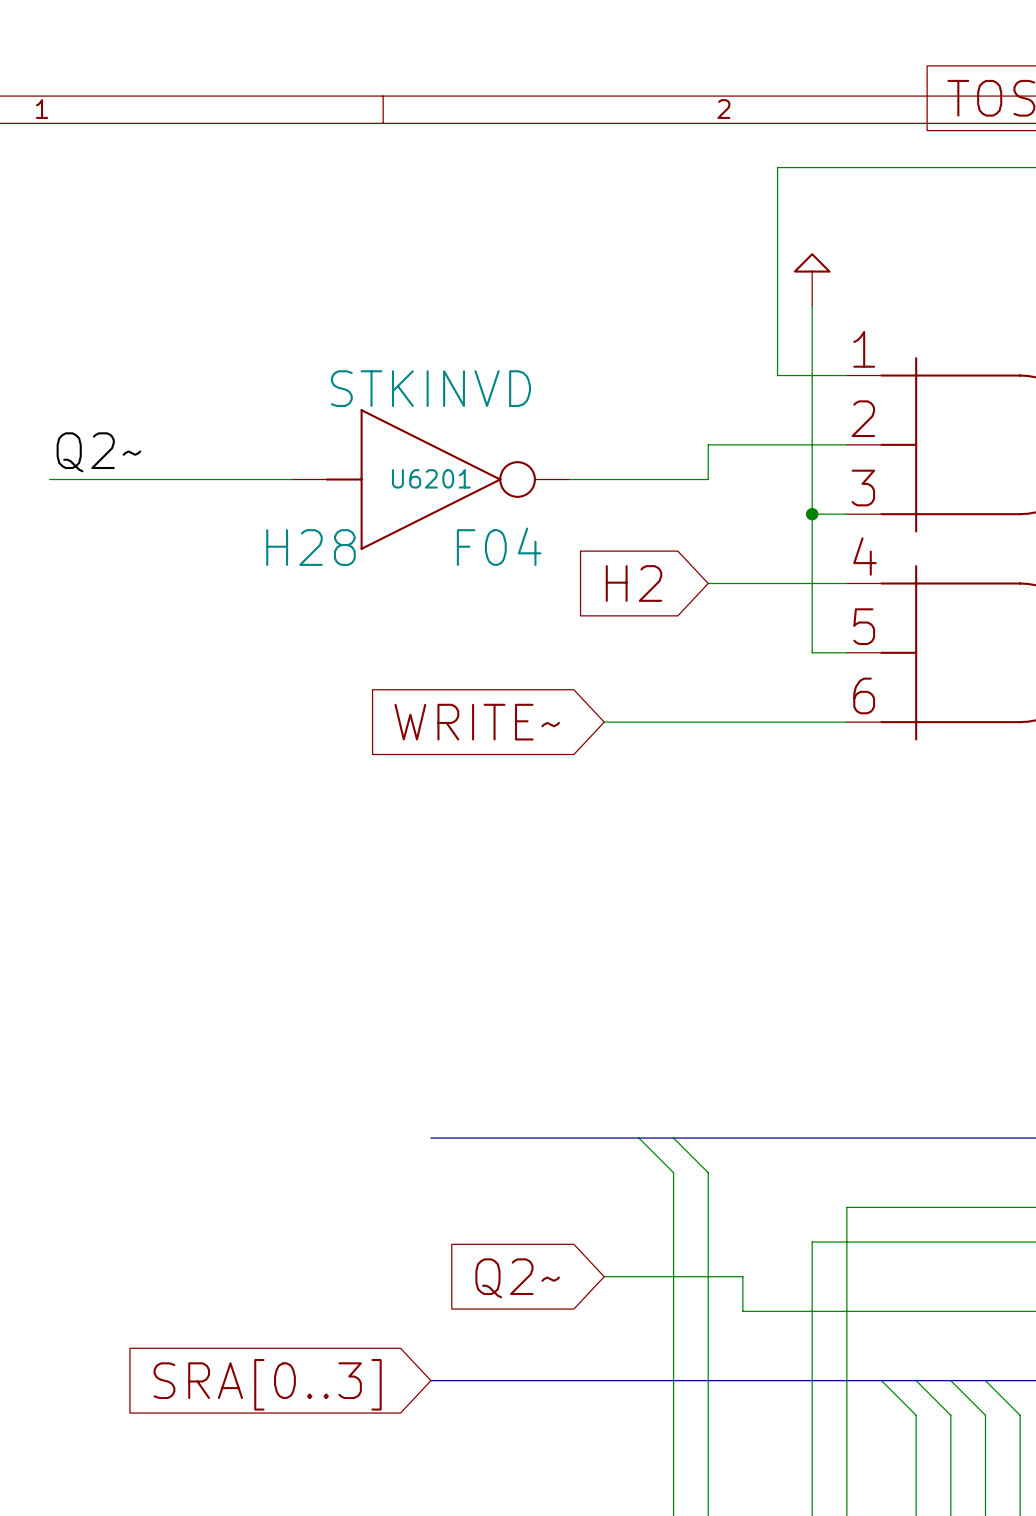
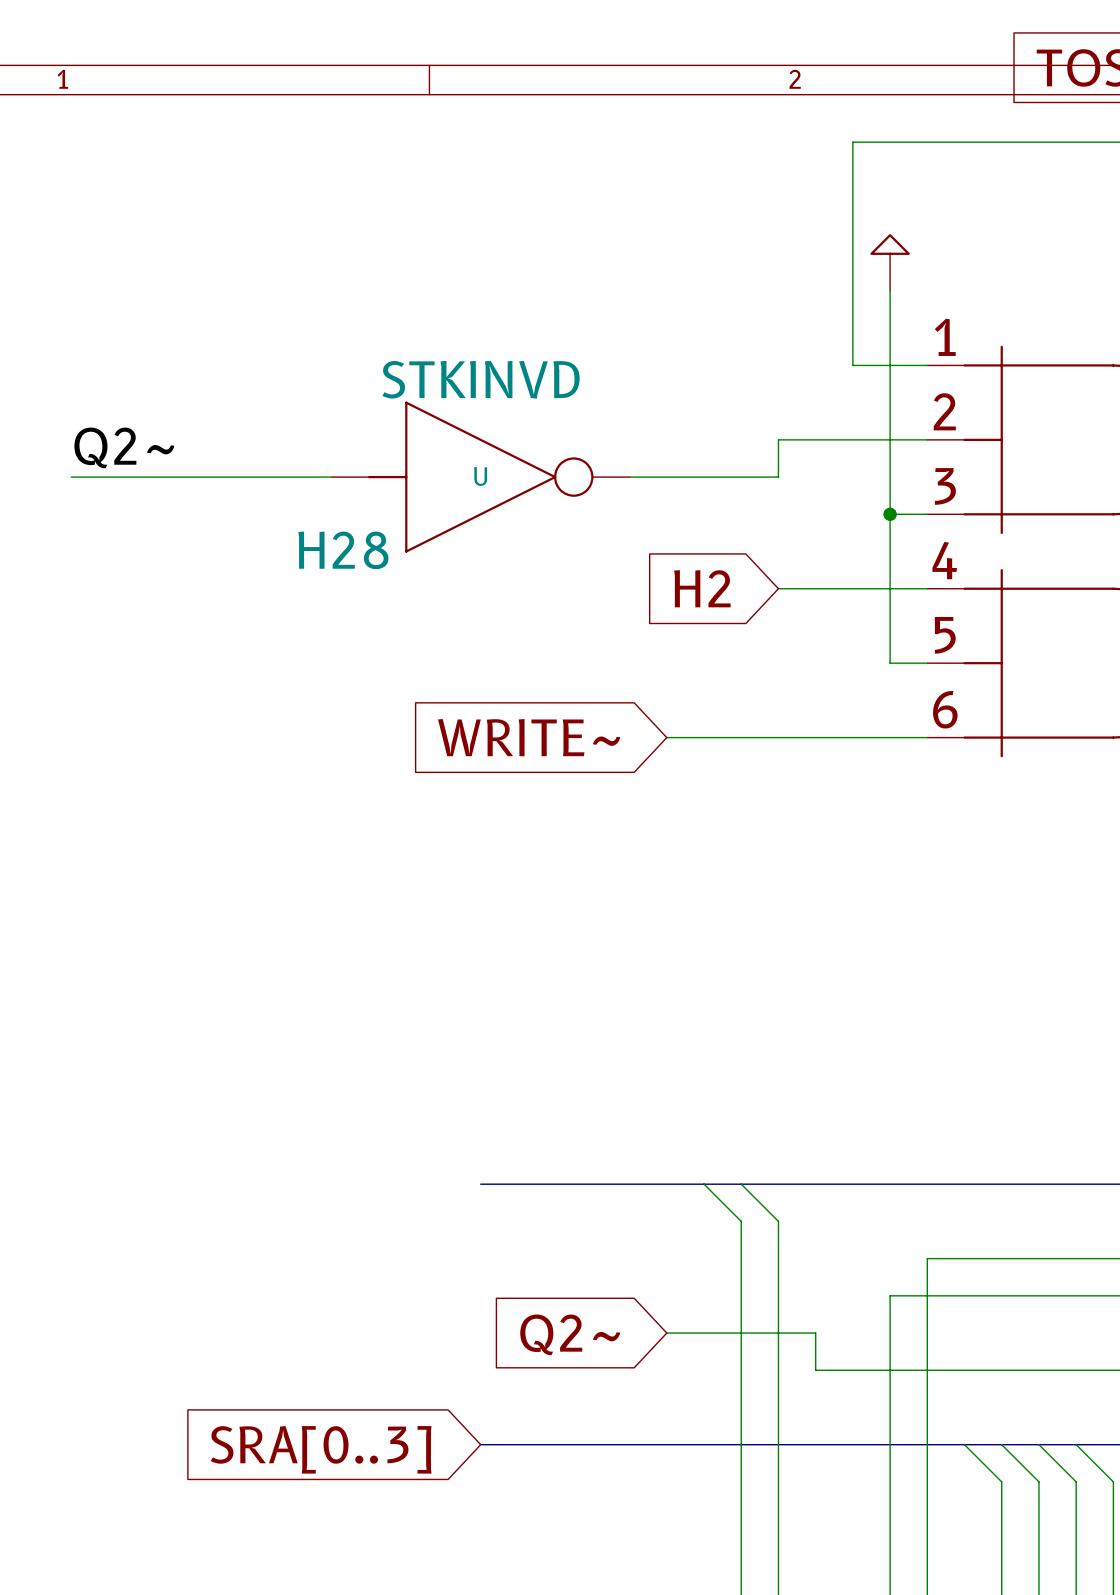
U6201 name: U6201 (431, 478) -> U (480, 476)
U6201 value: F04 (499, 546) -> none

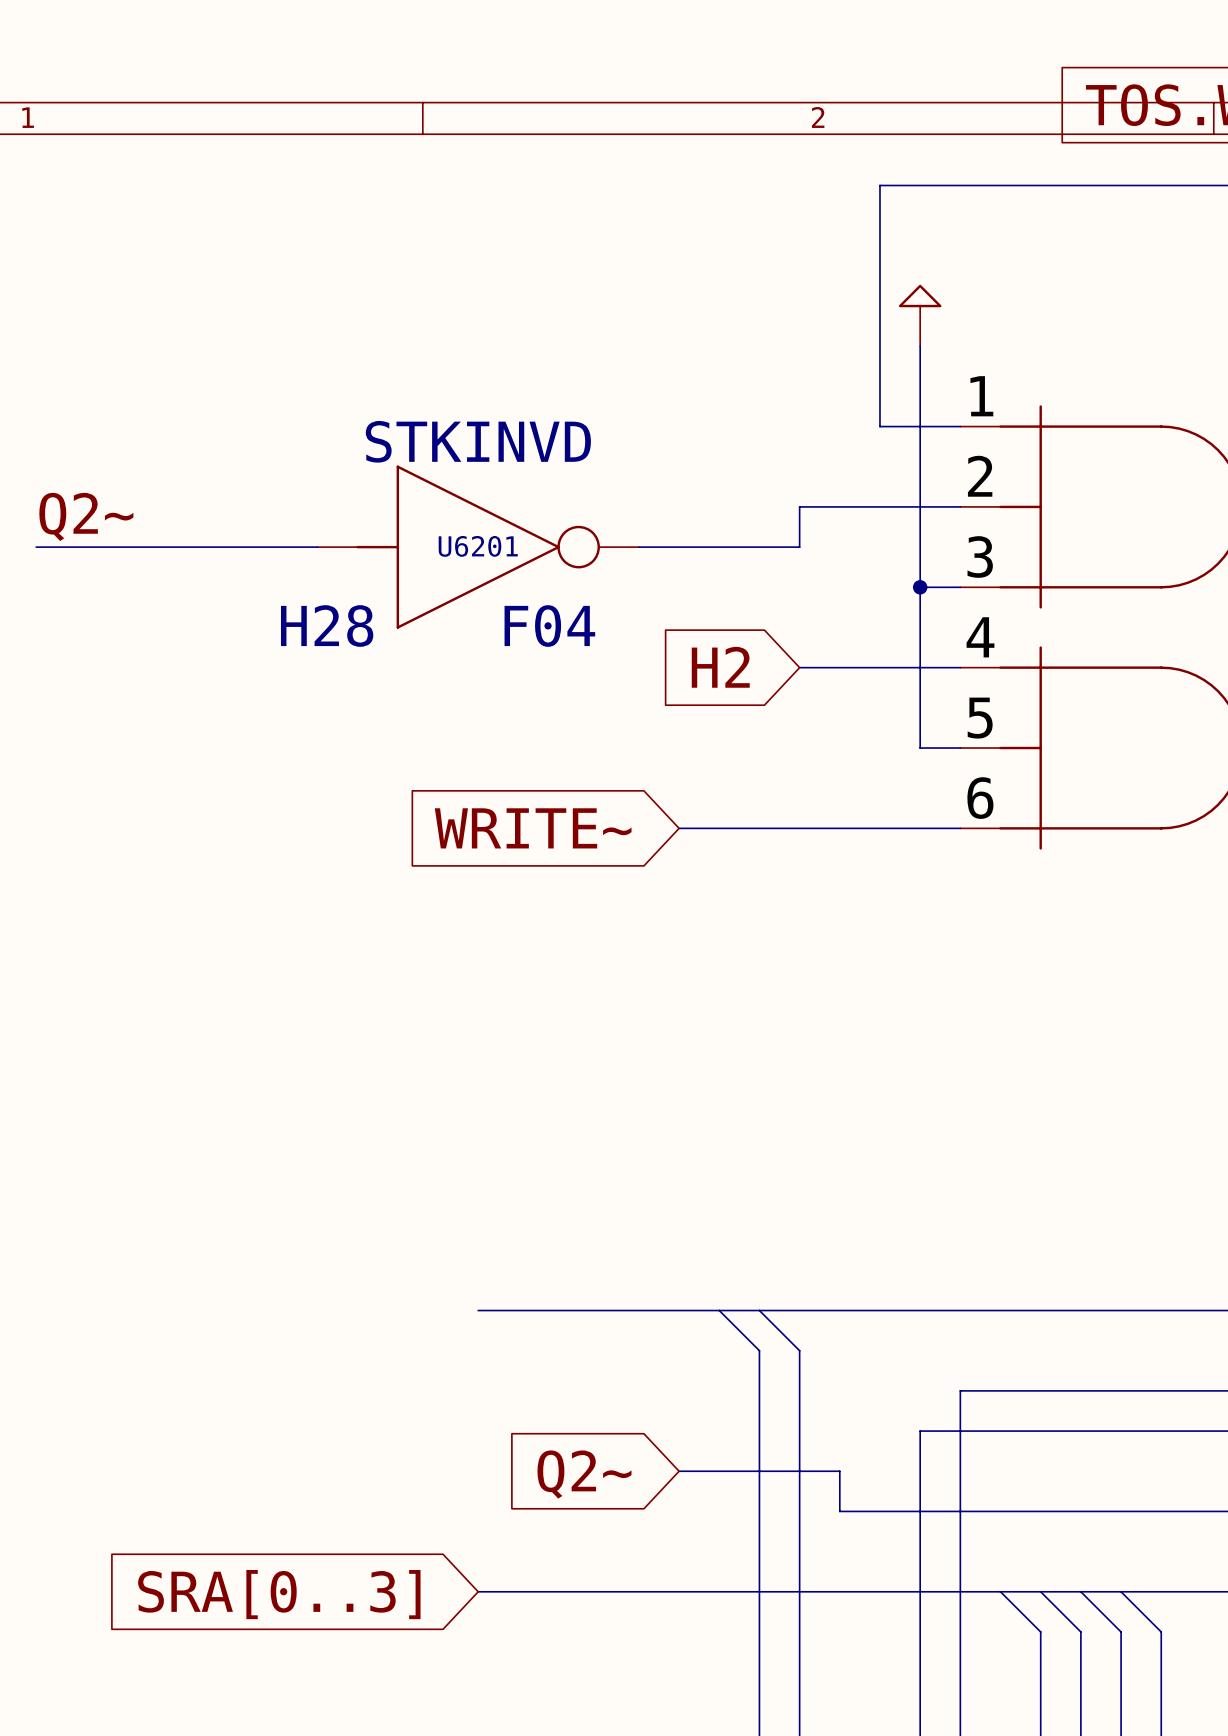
U name: U (480, 476) -> U6201 (478, 546)
U value: none -> F04 (549, 626)

